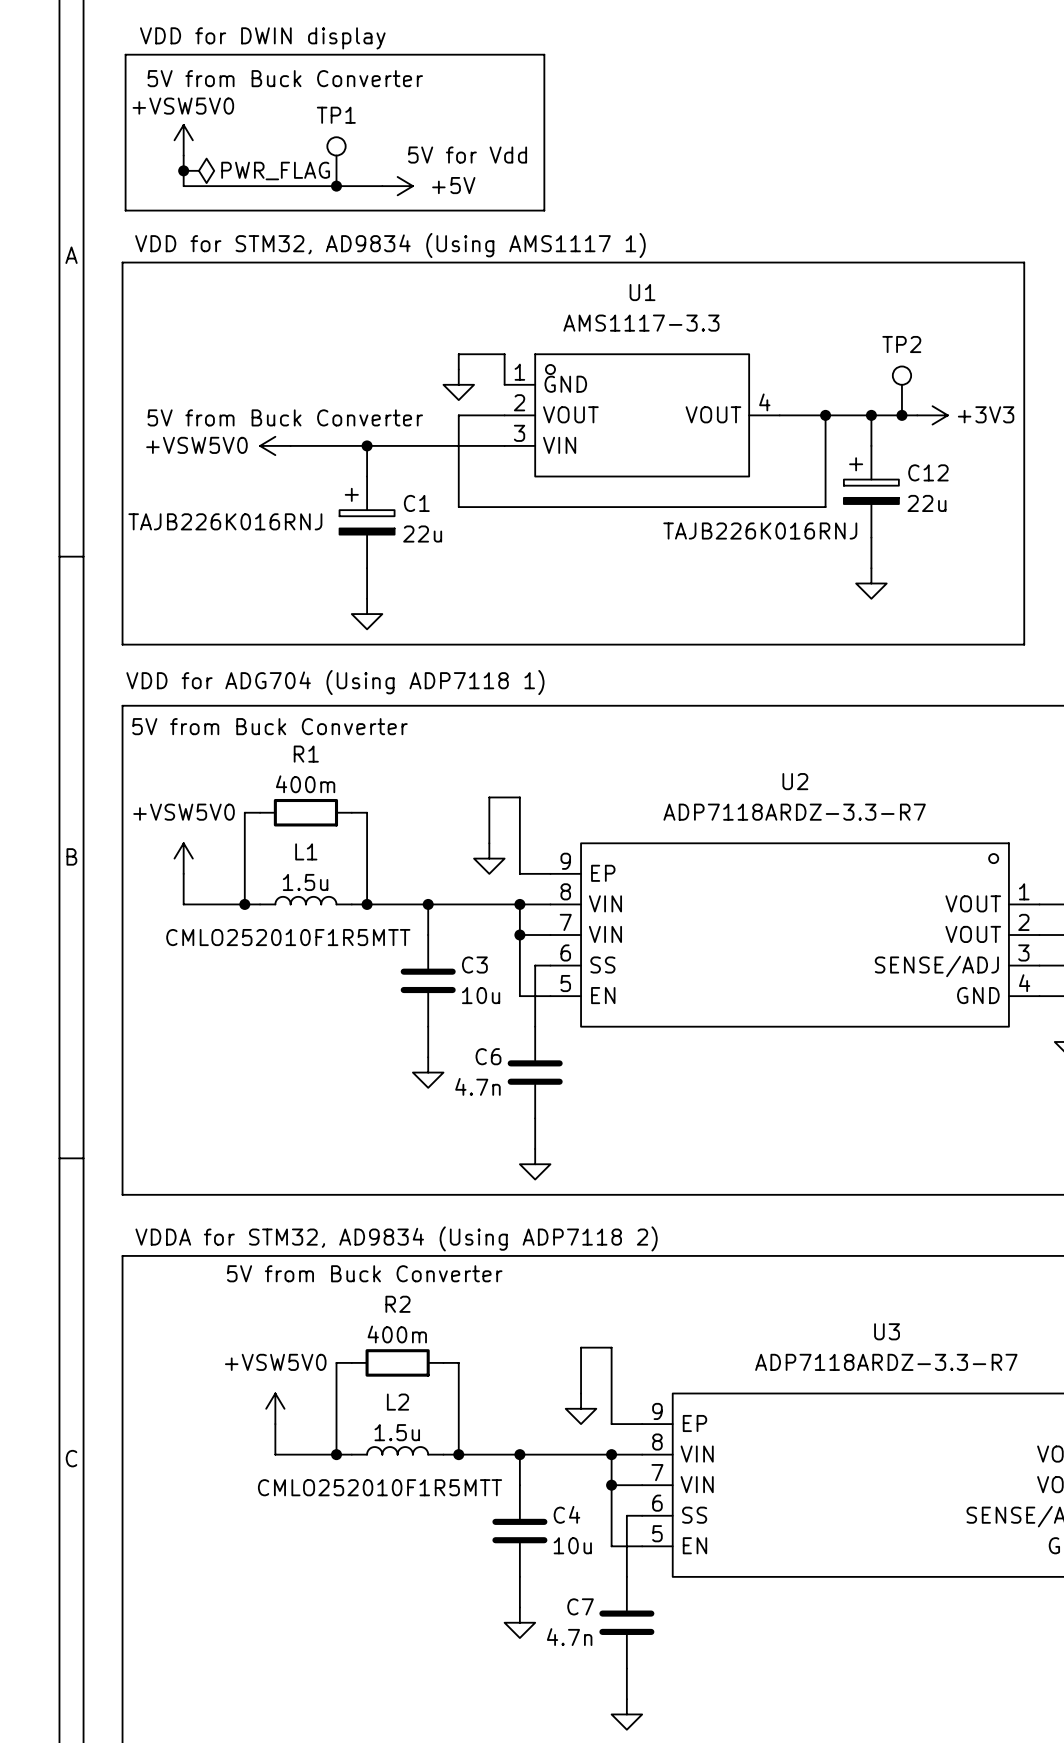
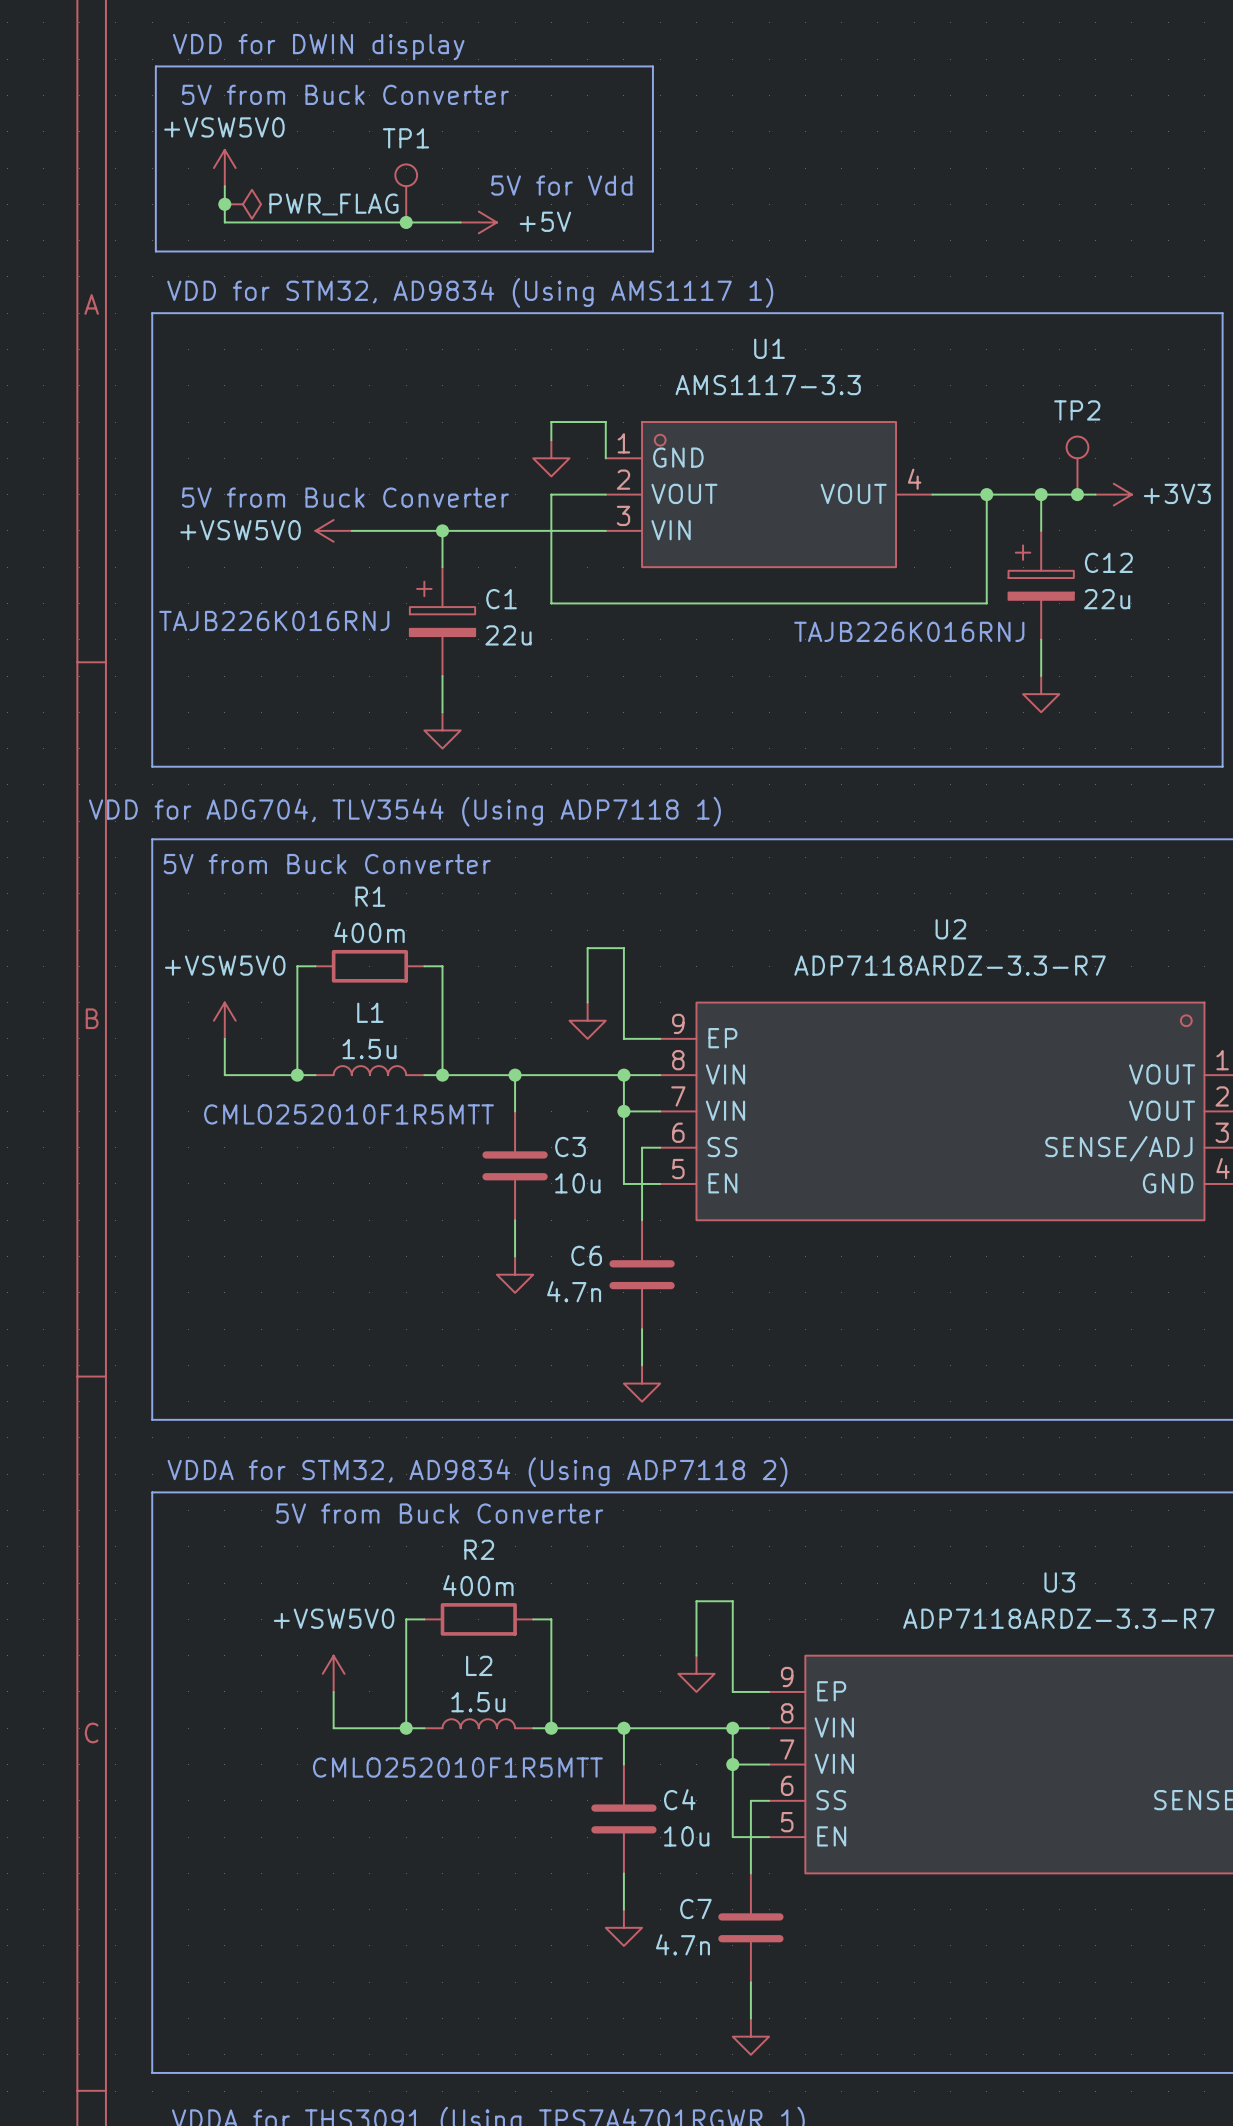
text: VDD for ADG704 (Using ADP7118 1) (335, 682) -> VDD for ADG704, TLV3544 (Using ADP7118 1) (404, 811)

